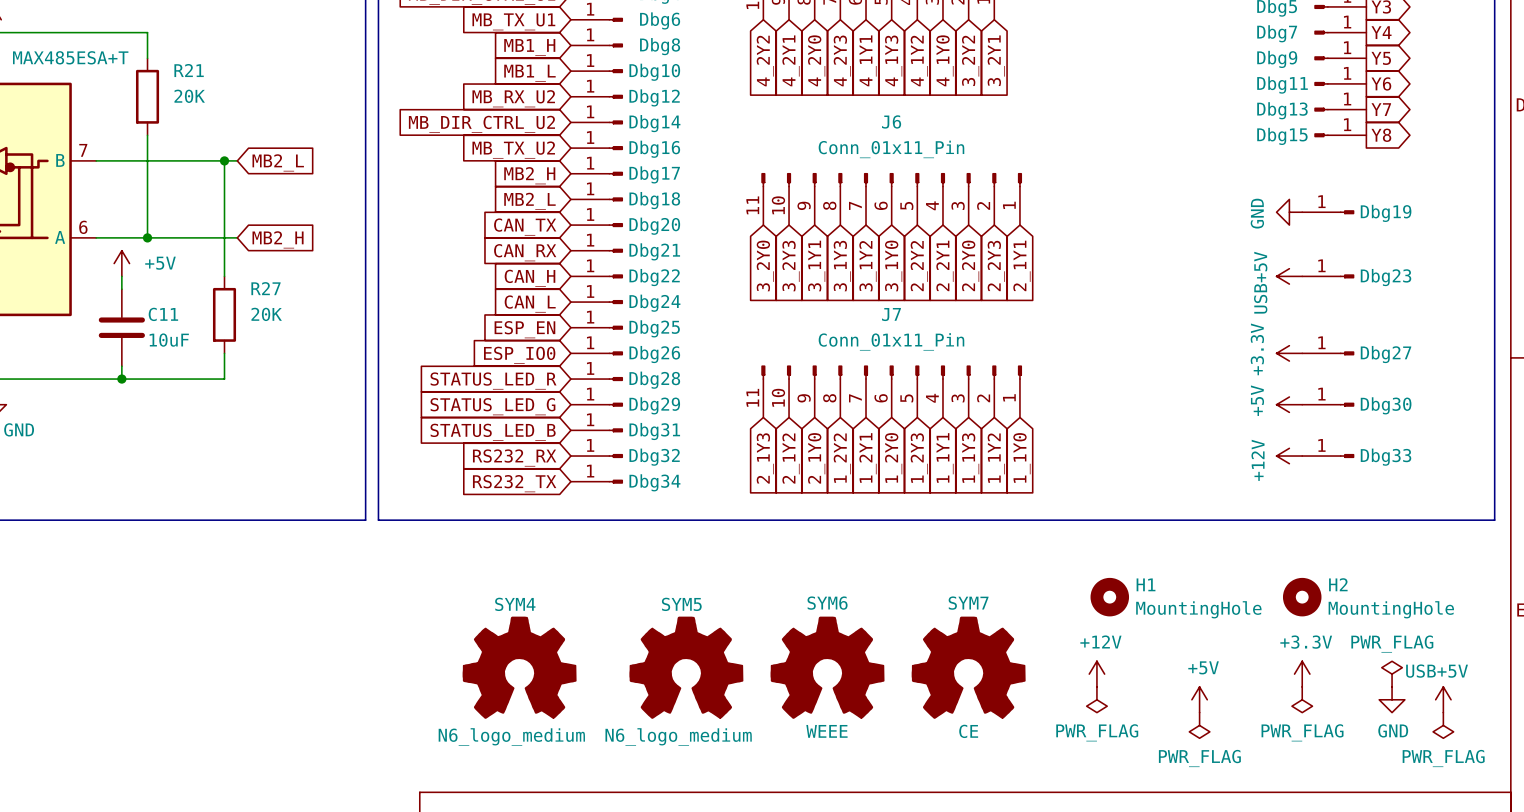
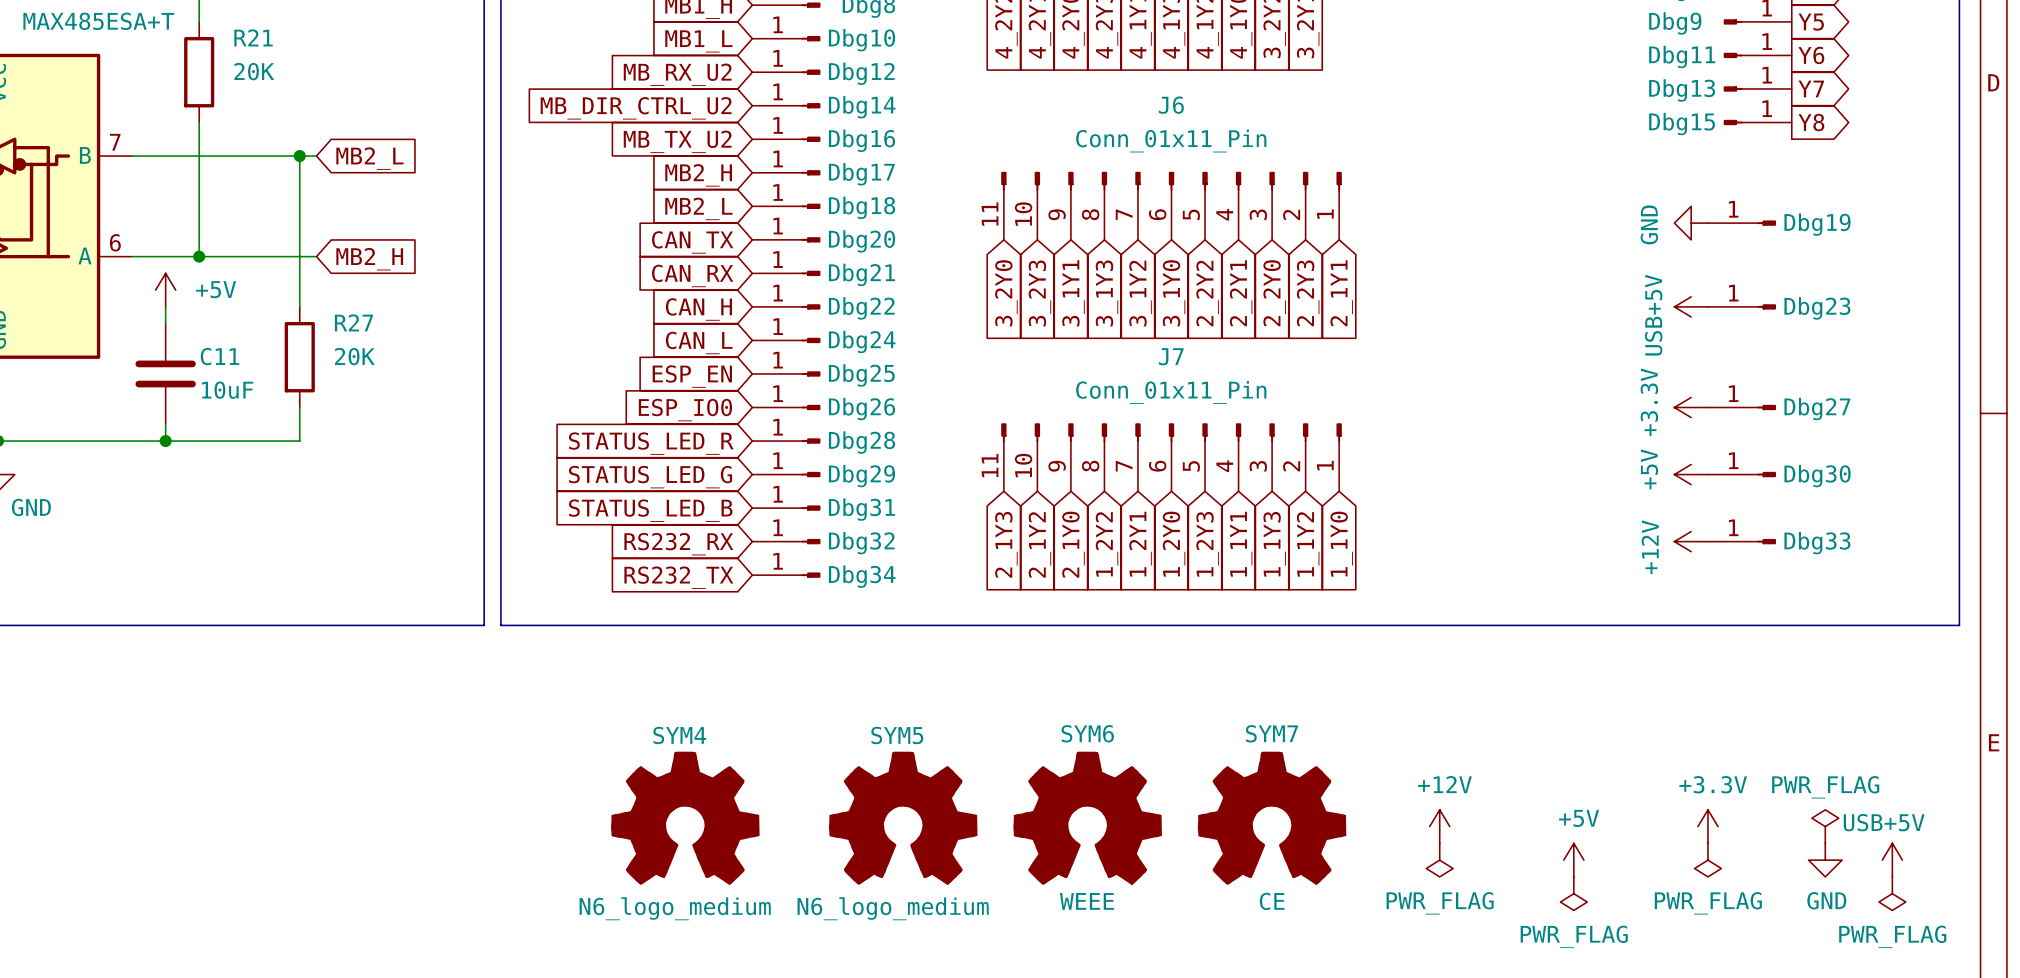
H1: MountingHole (1109, 597) -> none
H2: MountingHole (1302, 597) -> none

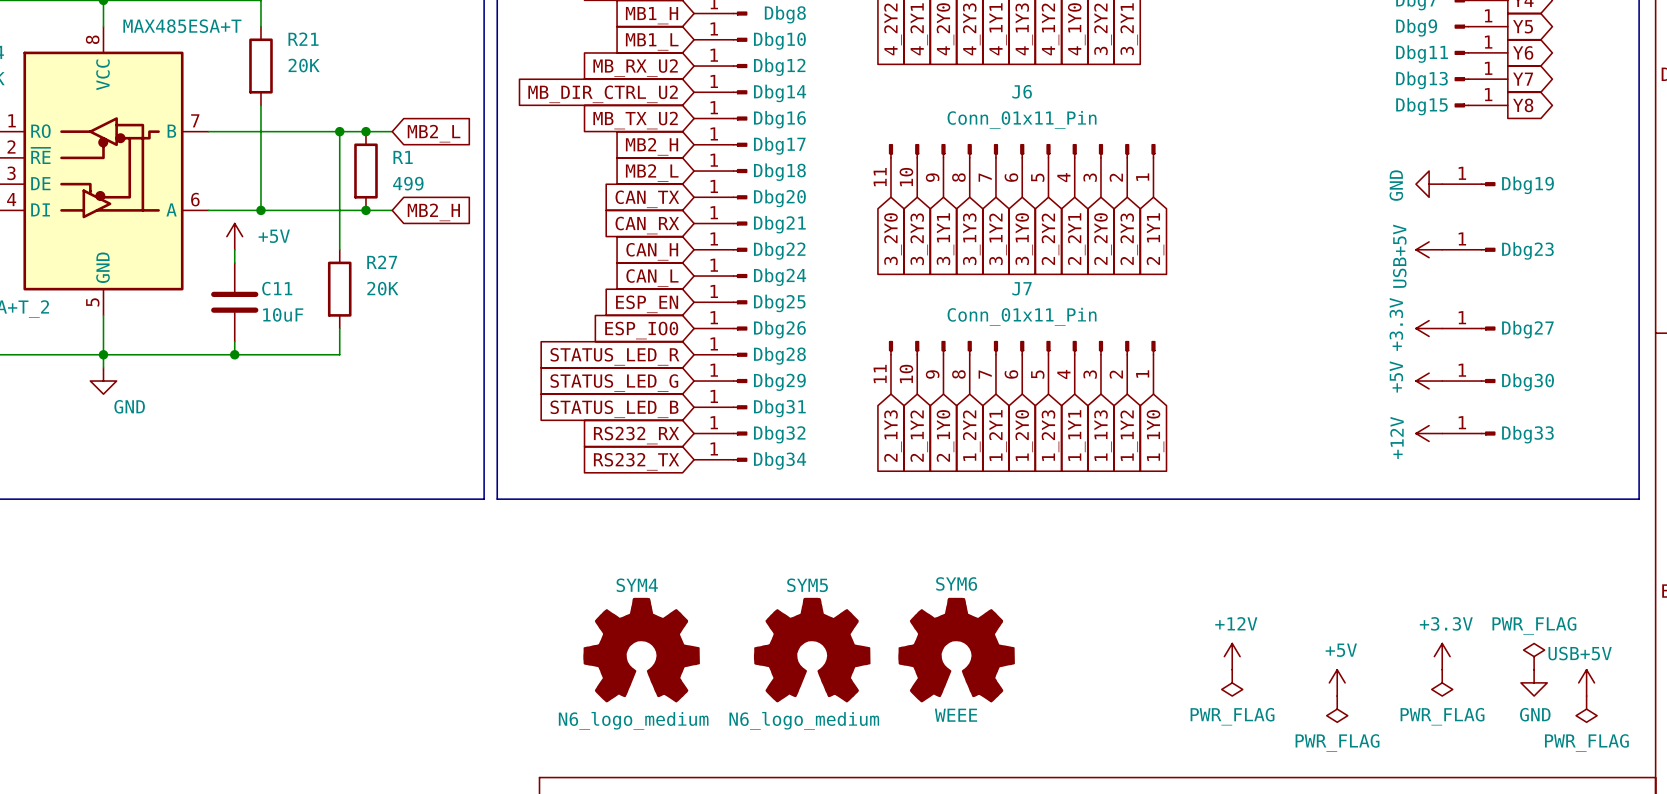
wire: none -> (352, 131) (392, 131)
junction: none -> (365, 131)
global label position: MB2_L (369, 158) -> MB2_L (434, 133)
R1: none -> 499 (365, 171)
wire: none -> (352, 210) (392, 210)
junction: none -> (365, 210)
global label position: MB2_H (369, 259) -> MB2_H (433, 212)
SYM7: CE (1272, 818) -> none

